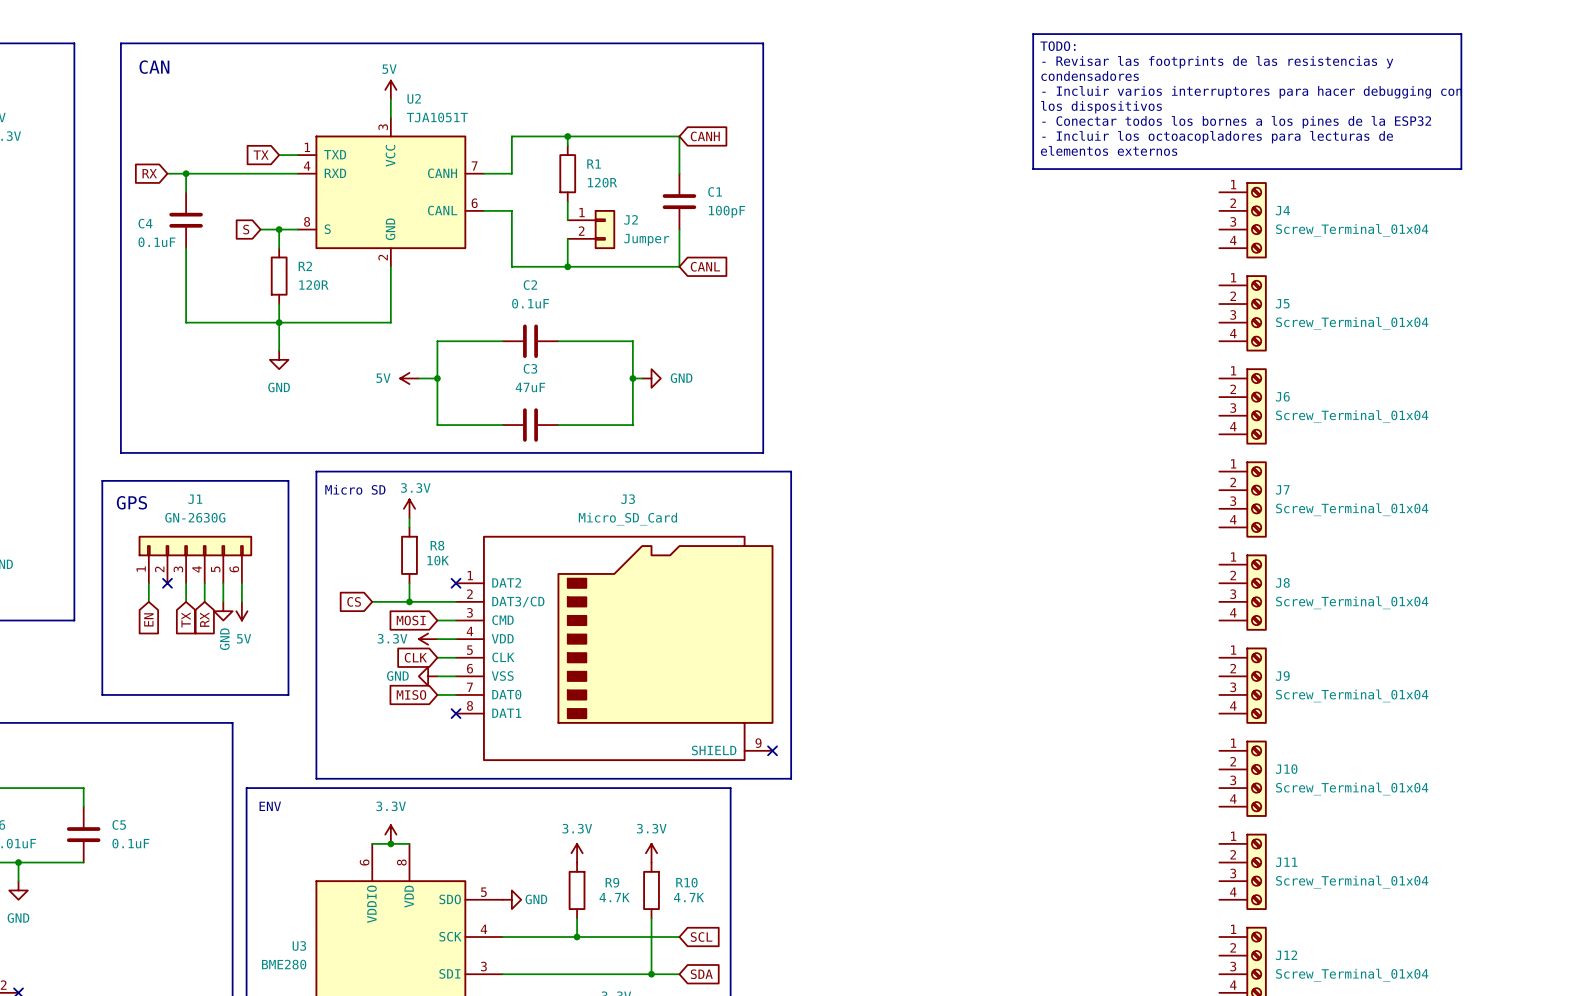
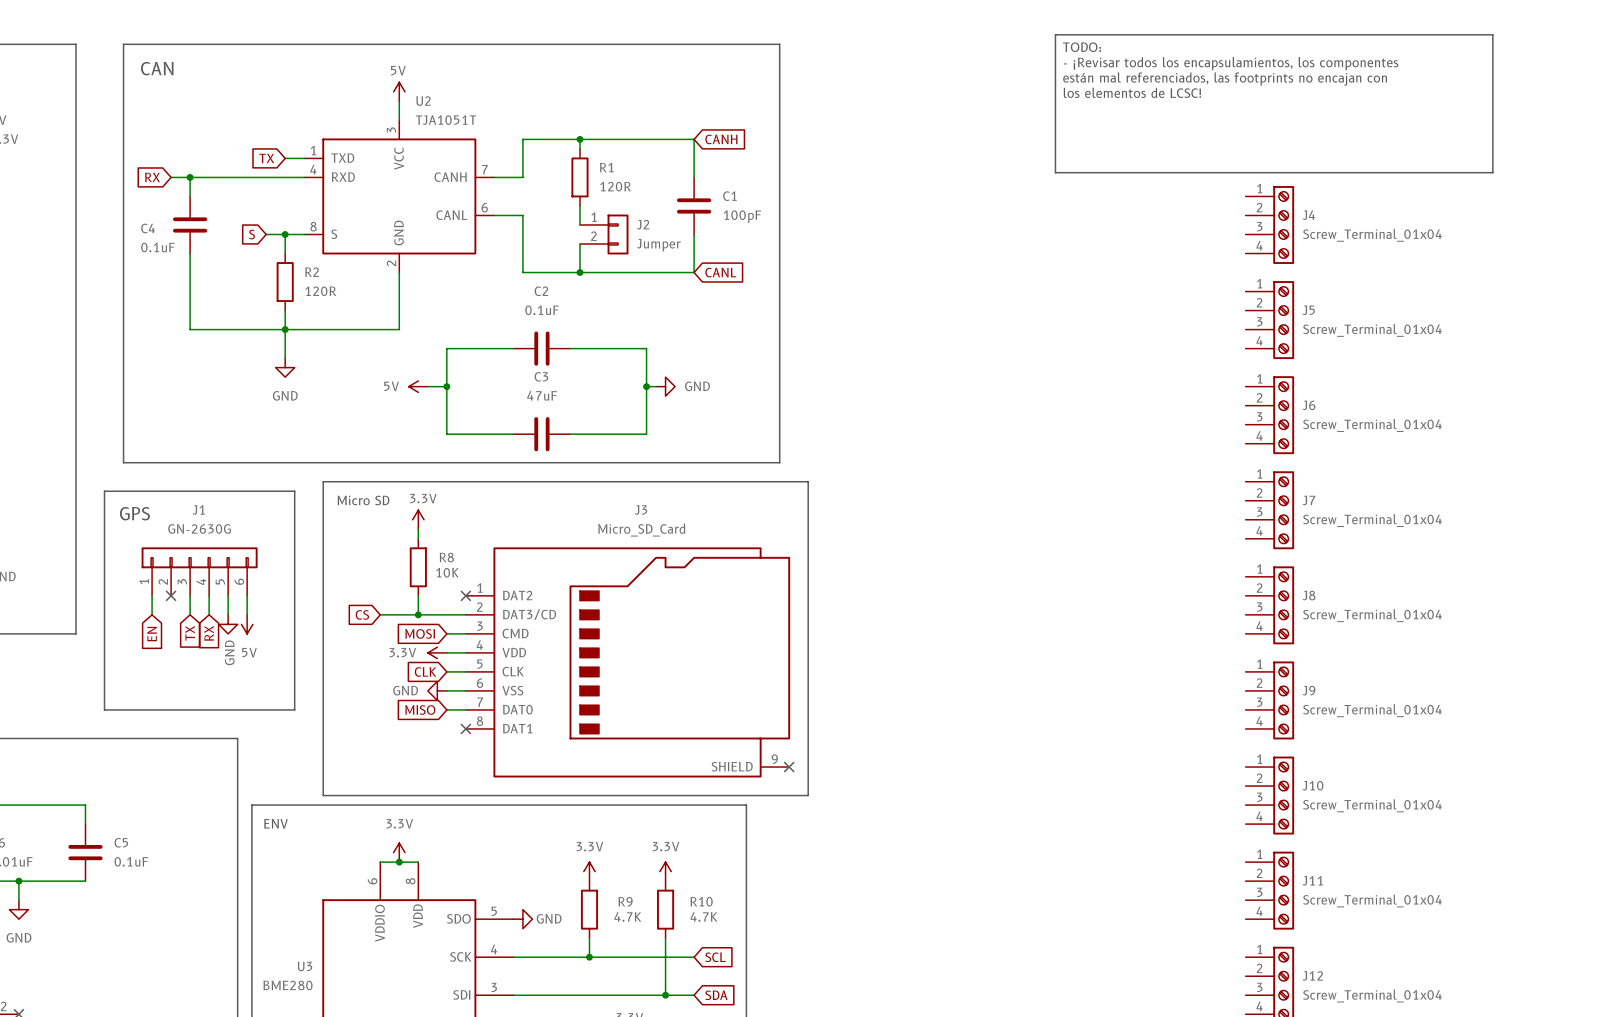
text: - Revisar las footprints de las resistencias y (1217, 62) -> - ¡Revisar todos los encapsulamientos, los componentes (1231, 63)
text: condensadores (1090, 76) -> están mal referenciados, las footprints no encajan con (1225, 79)
text: - Incluir varios interruptores para hacer debugging con (1252, 92) -> los elementos de LCSC! (1132, 92)
text: los dispositivos (1101, 107) -> none
text: - Conectar todos los bornes a los pines de la ESP32 (1236, 122) -> none
text: - Incluir los octoacopladores para lecturas de (1217, 137) -> none
text: elementos externos (1109, 150) -> none

